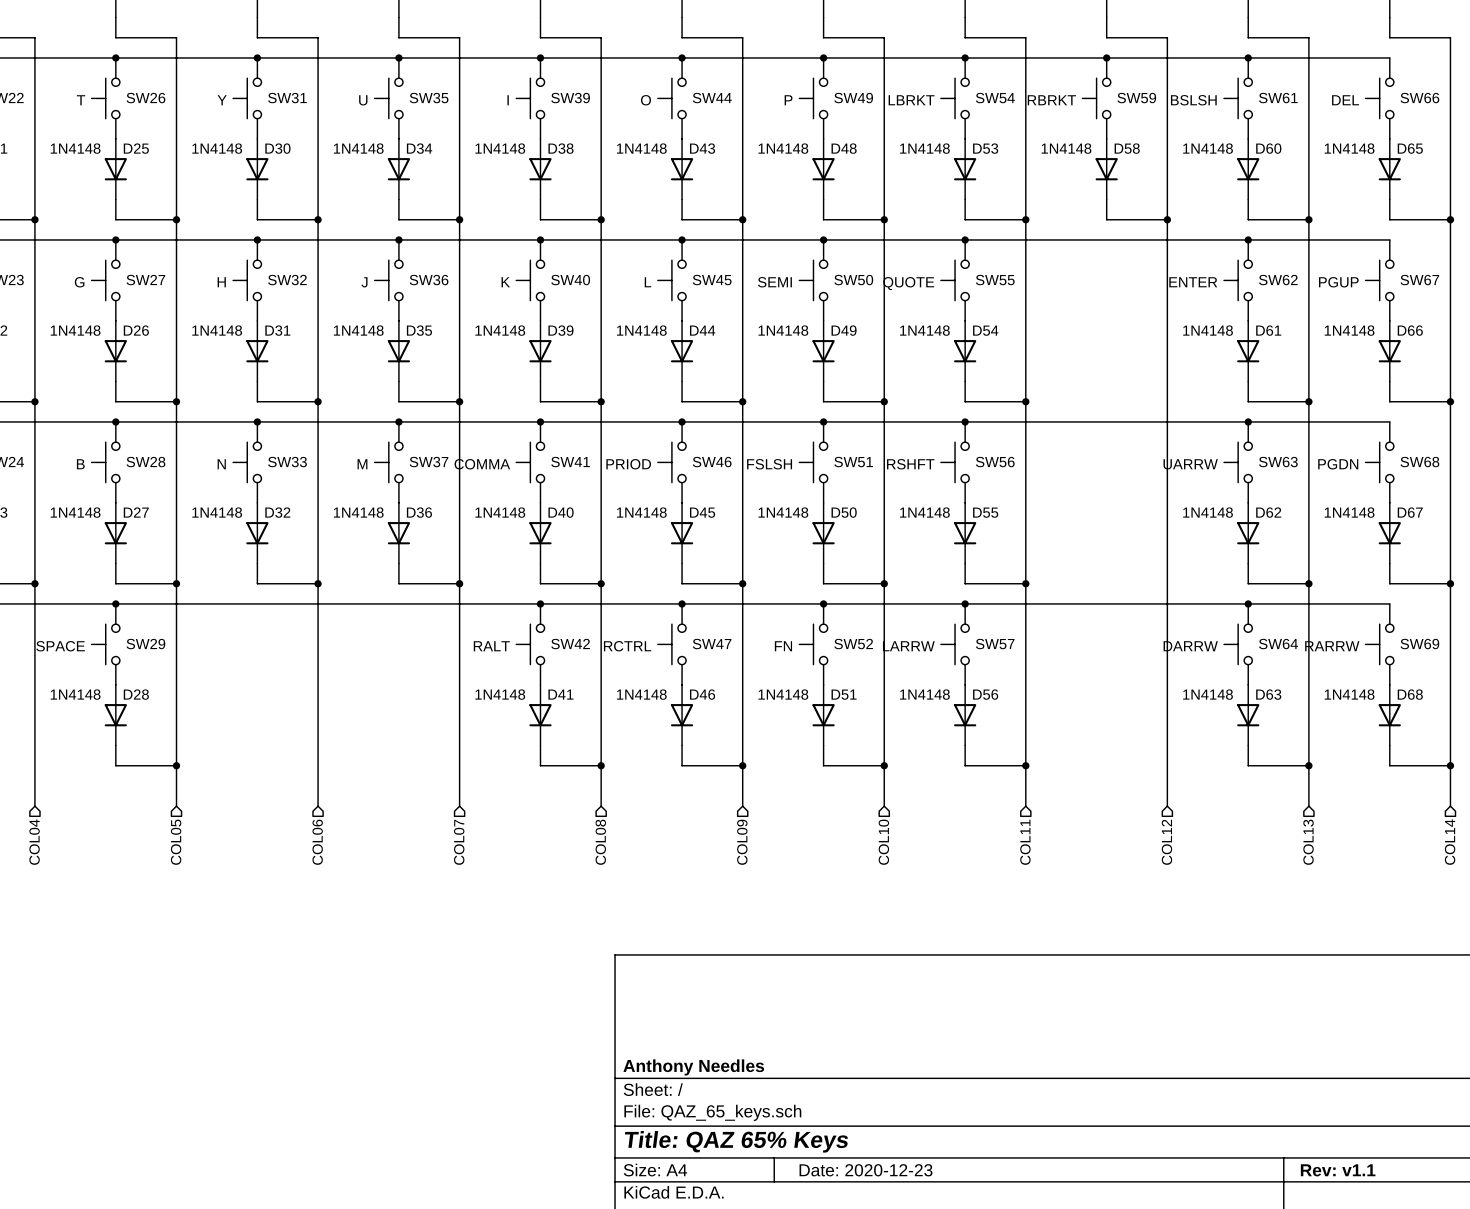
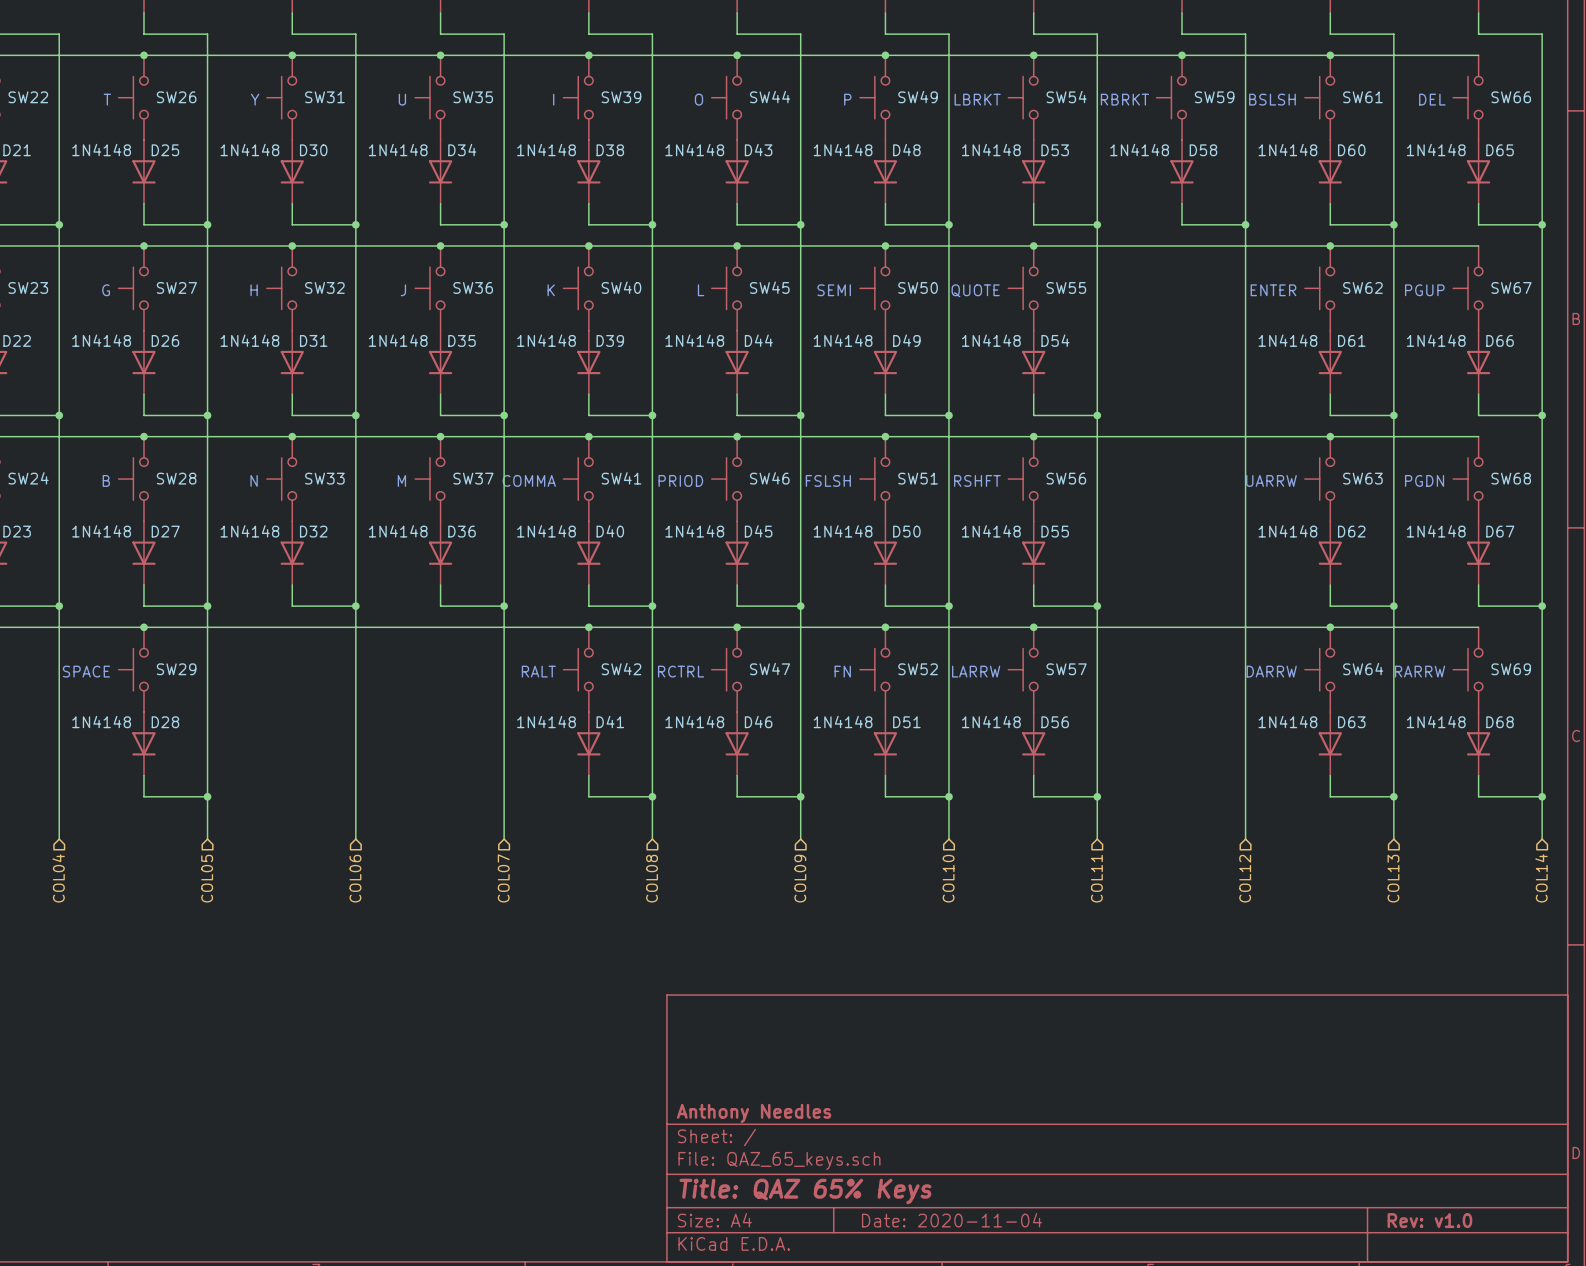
title block: Date: 2020-12-23 (866, 1170) -> Date: 2020-11-04 (951, 1220)
title block: Rev: v1.1 (1338, 1170) -> Rev: v1.0 (1429, 1220)

